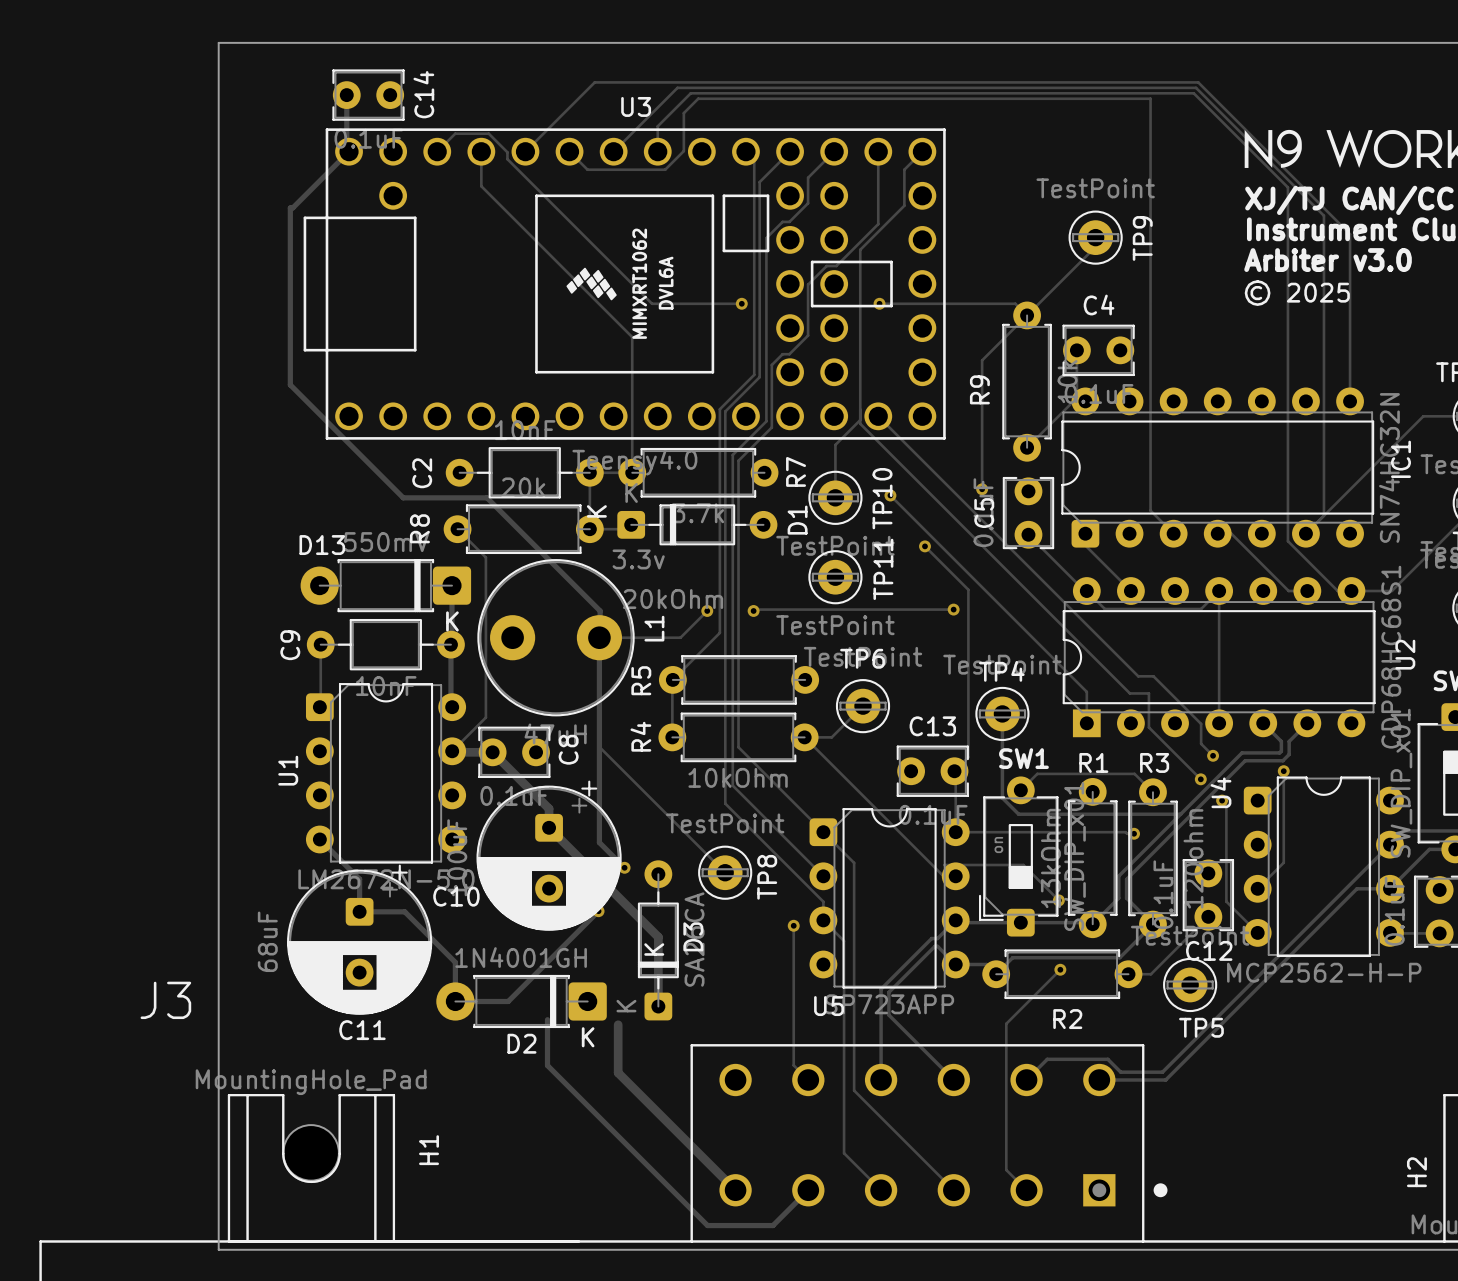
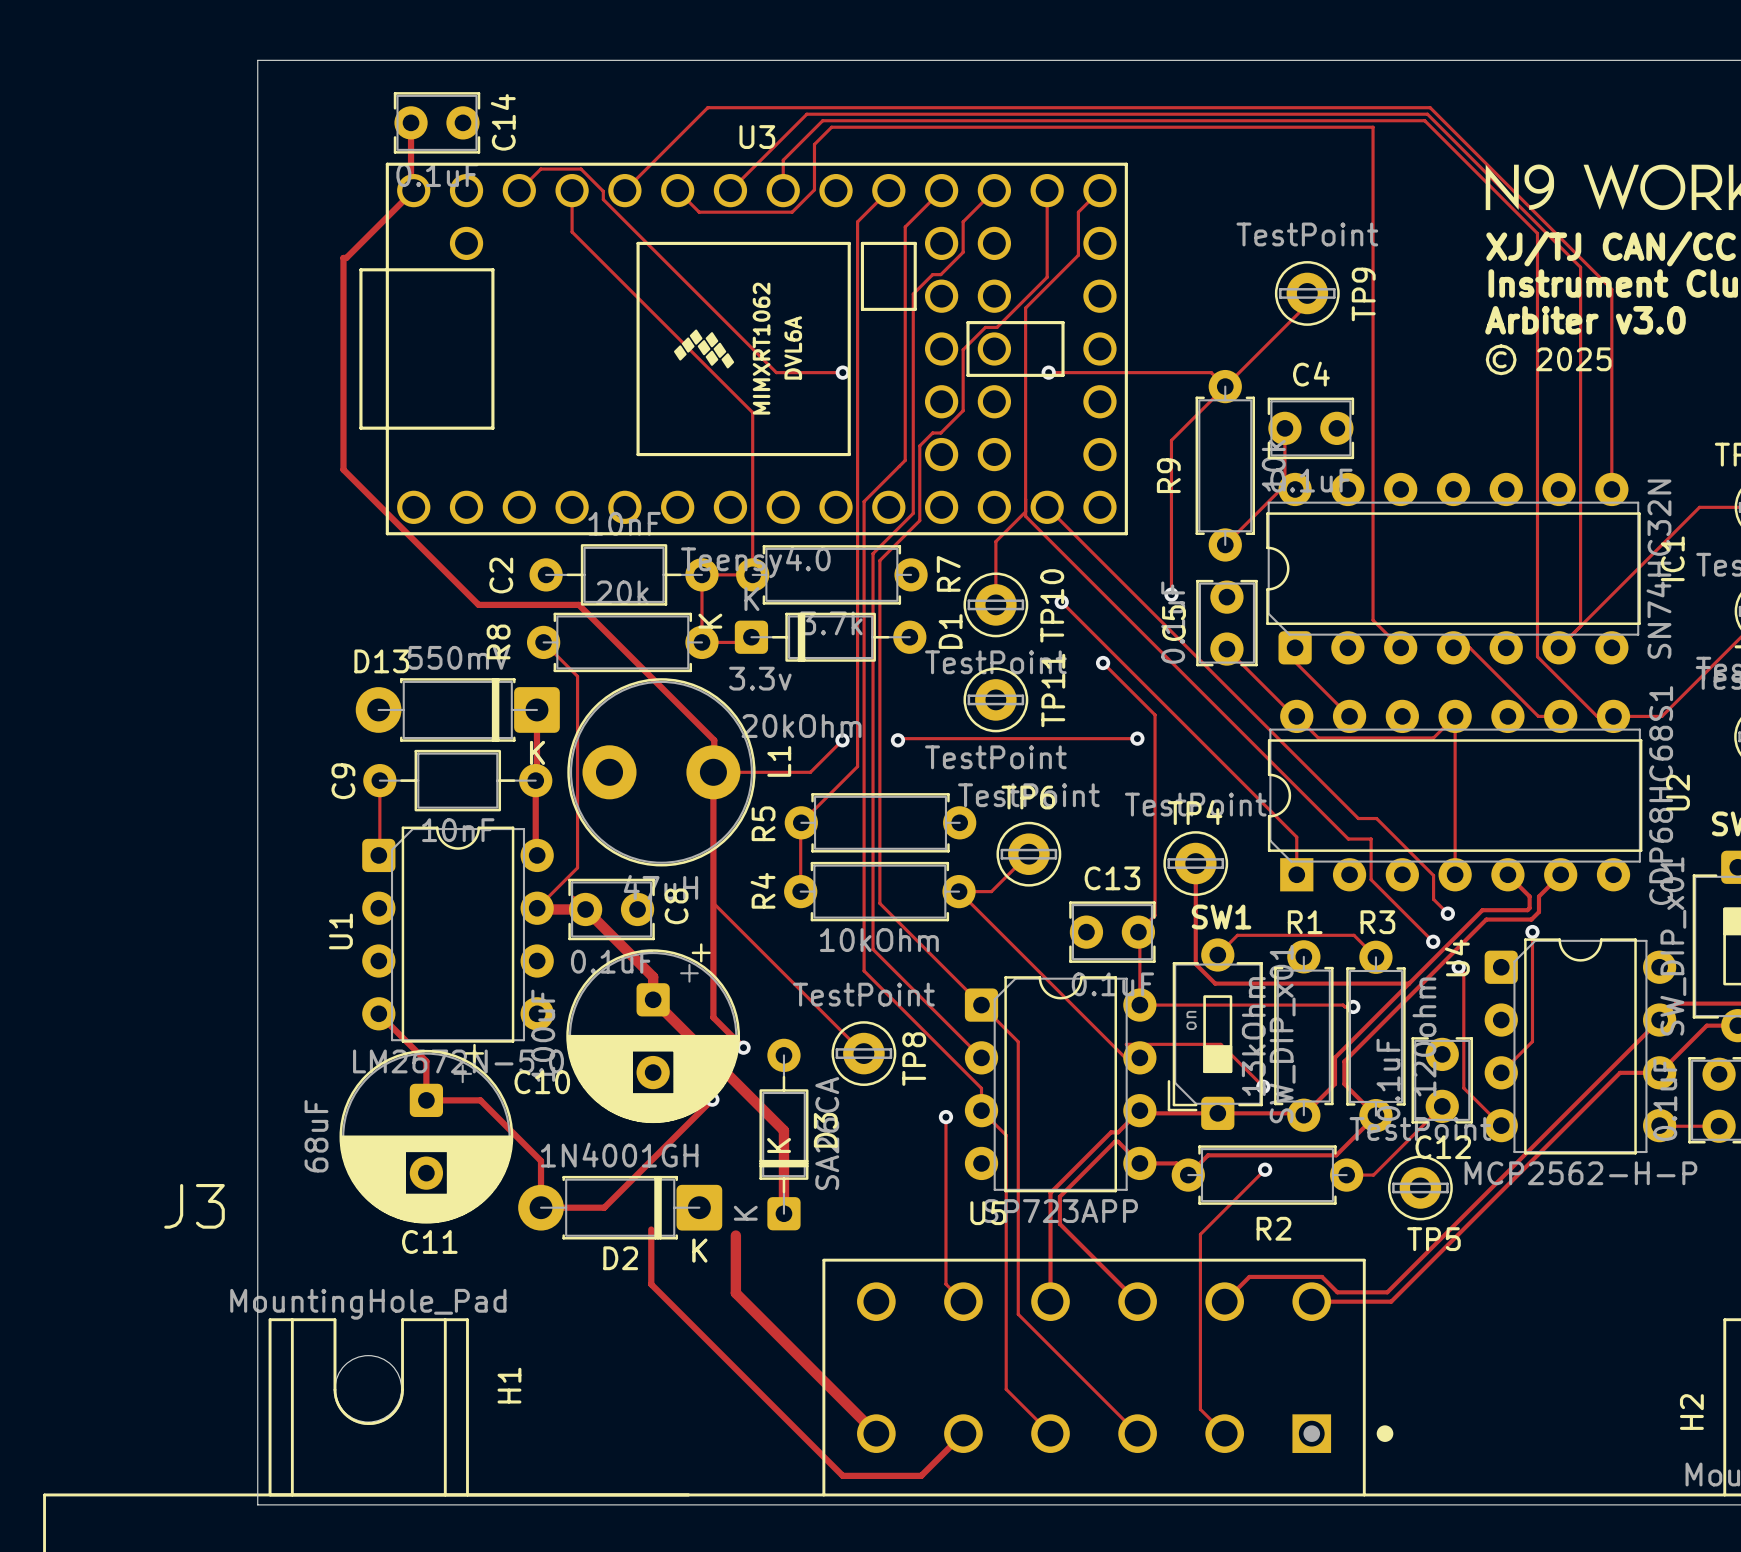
track: (745, 151) (754, 159) (754, 374) (719, 409) -> (888, 190) (857, 221) (857, 498)
track: (707, 303) (741, 303) -> none
via position: (741, 303) -> (842, 372)

